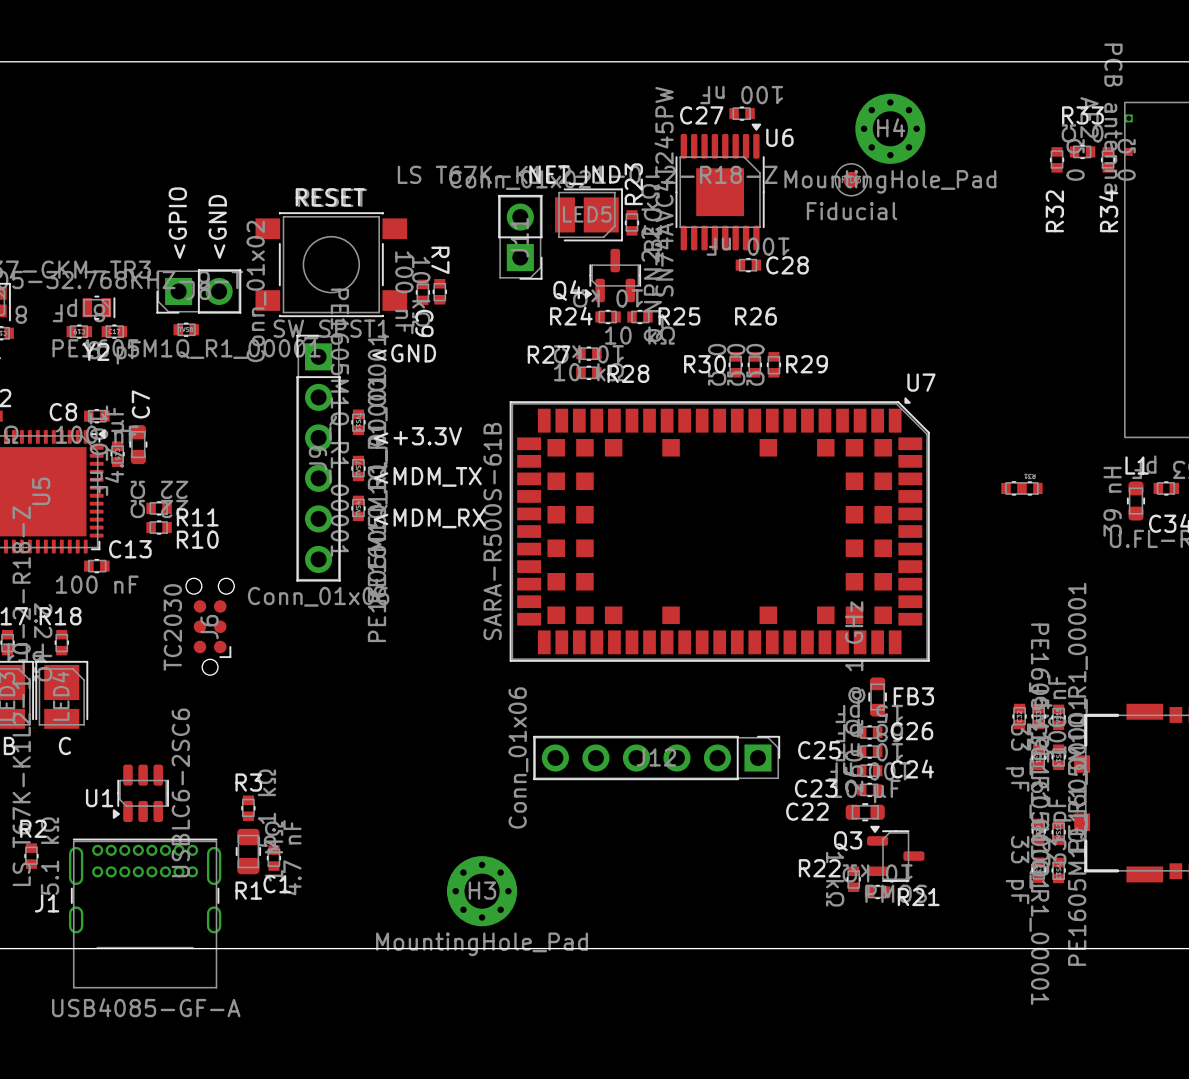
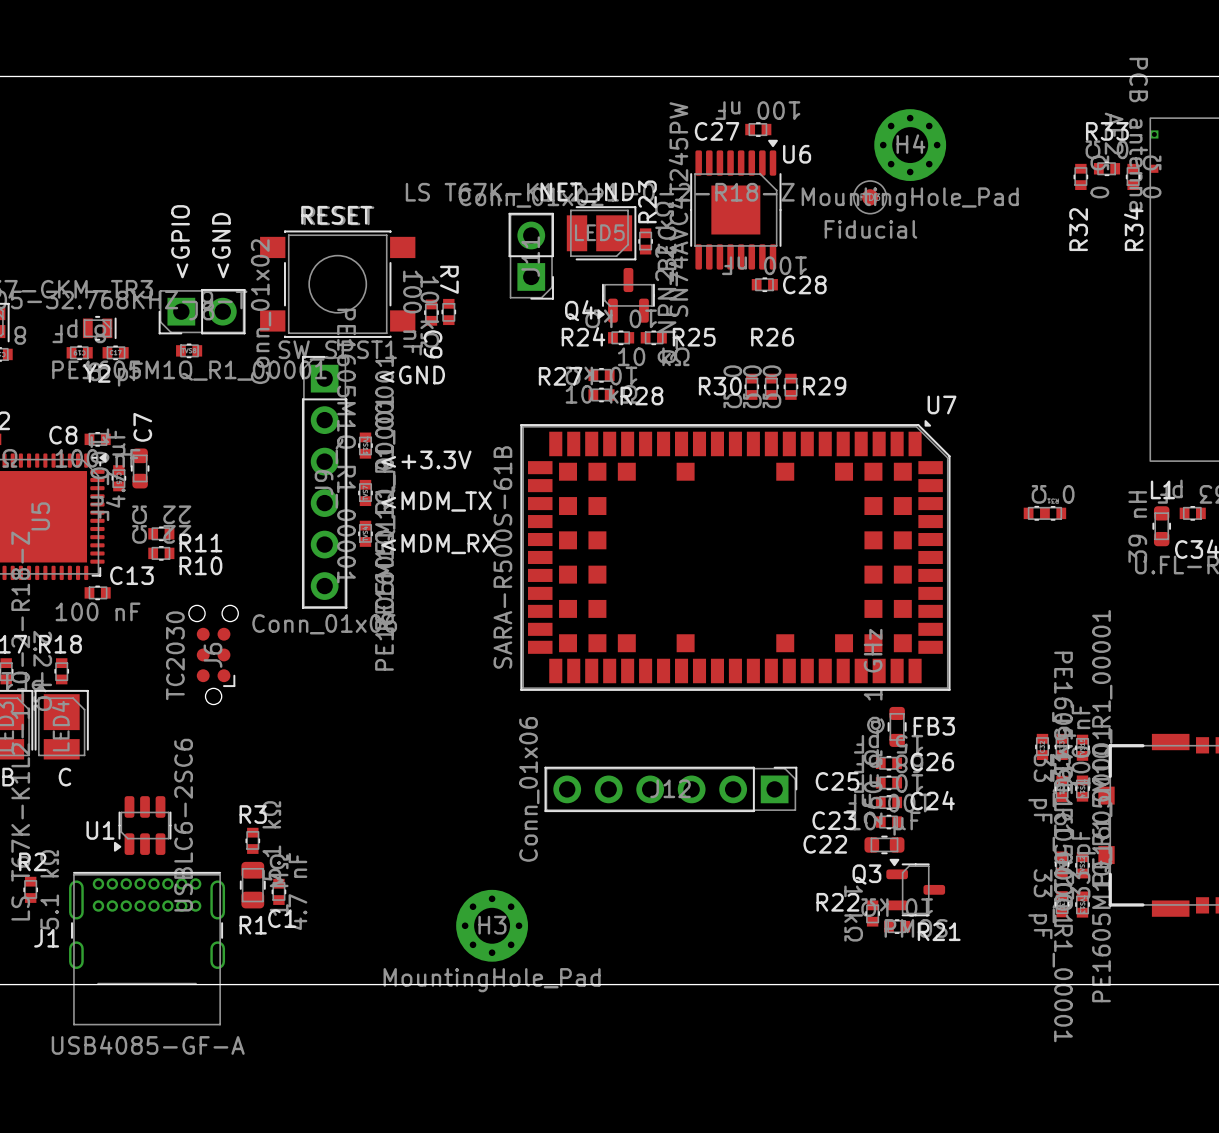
part value: none -> 0 Ω (1053, 494)

